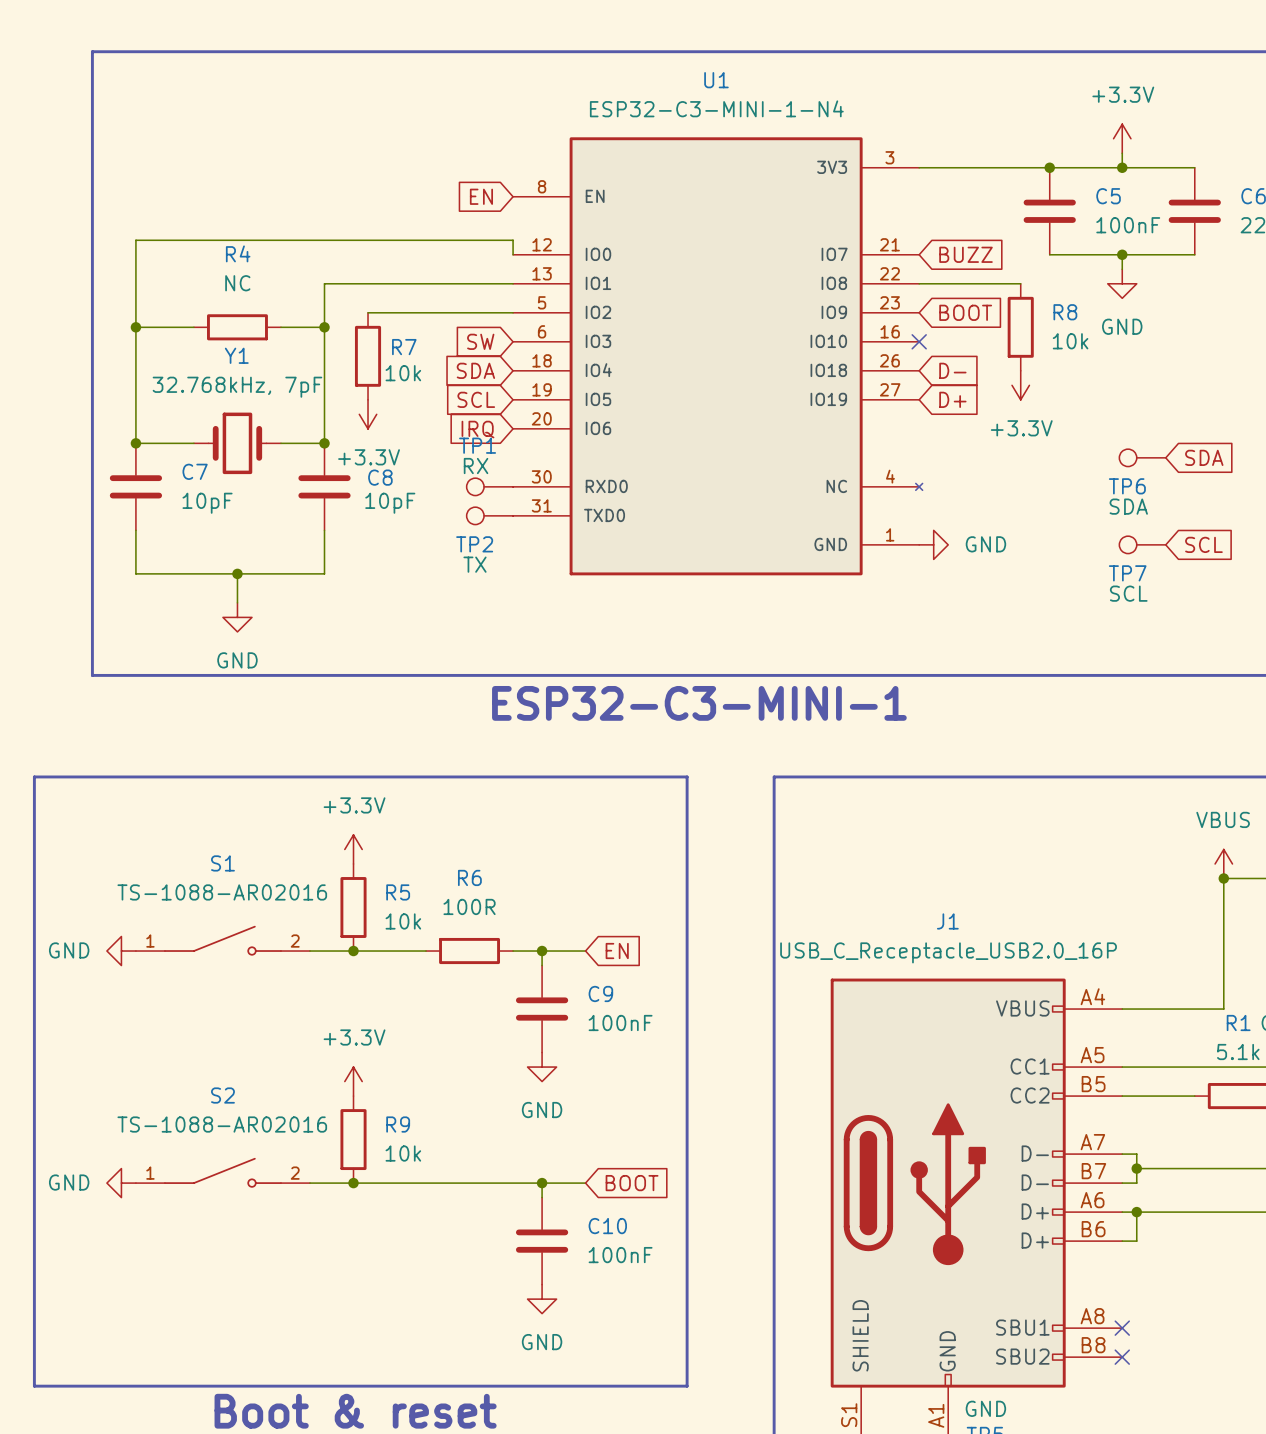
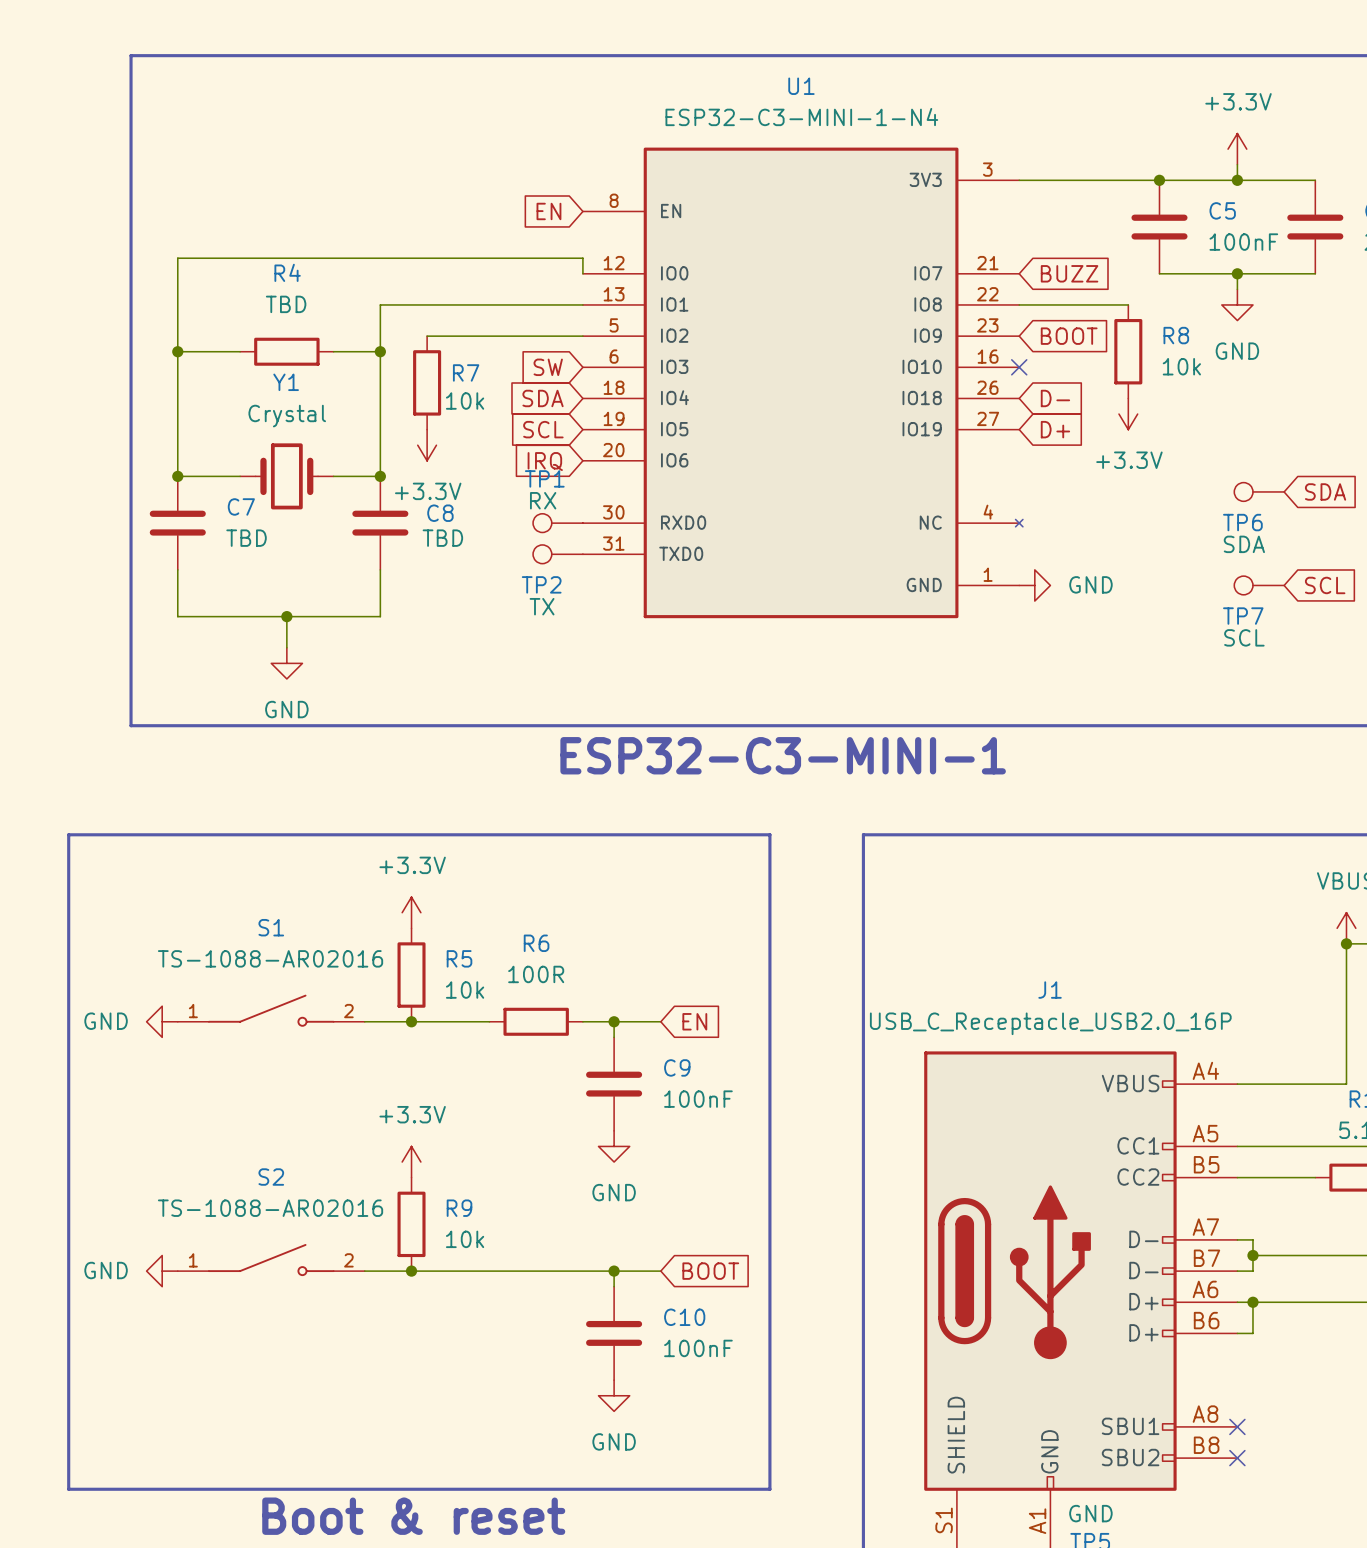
R4 value: NC (237, 283) -> TBD (286, 304)
Y1 value: 32.768kHz, 7pF (237, 387) -> Crystal (287, 416)
C7 value: 10pF (207, 503) -> TBD (246, 538)
C8 value: 10pF (390, 503) -> TBD (442, 538)

